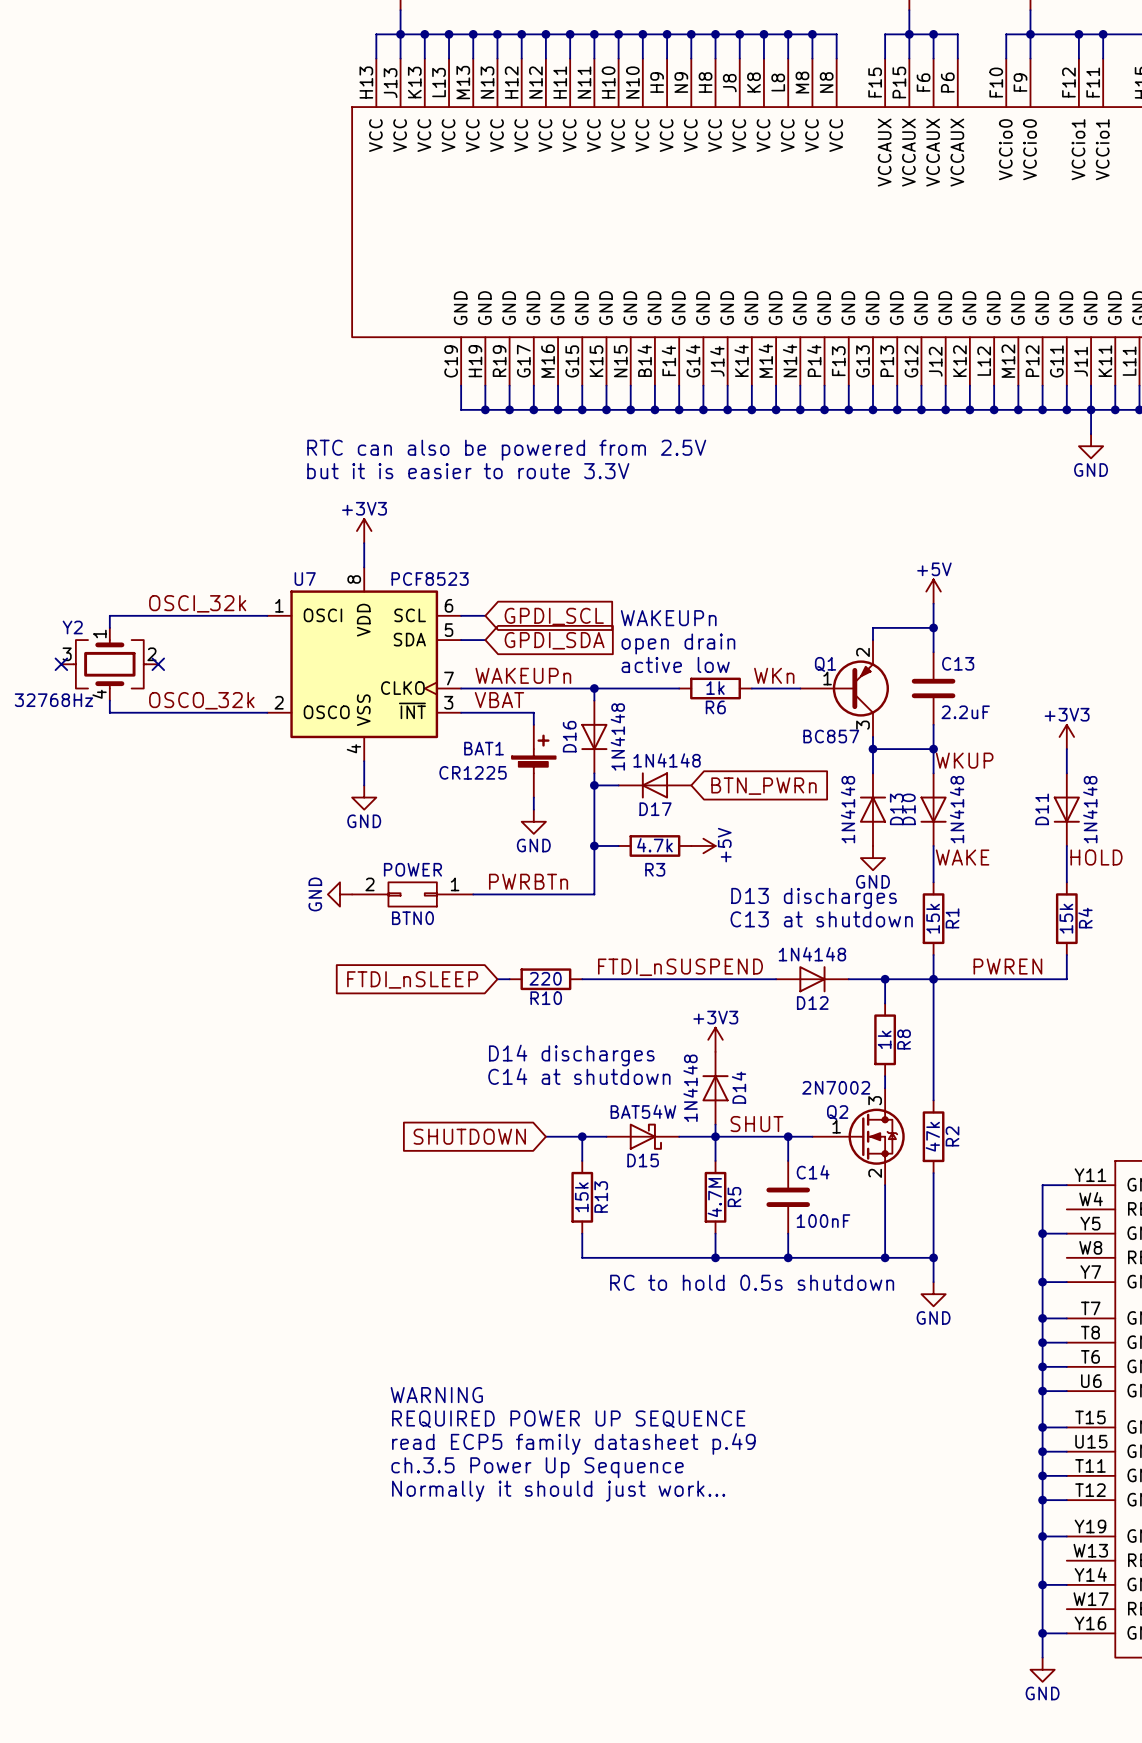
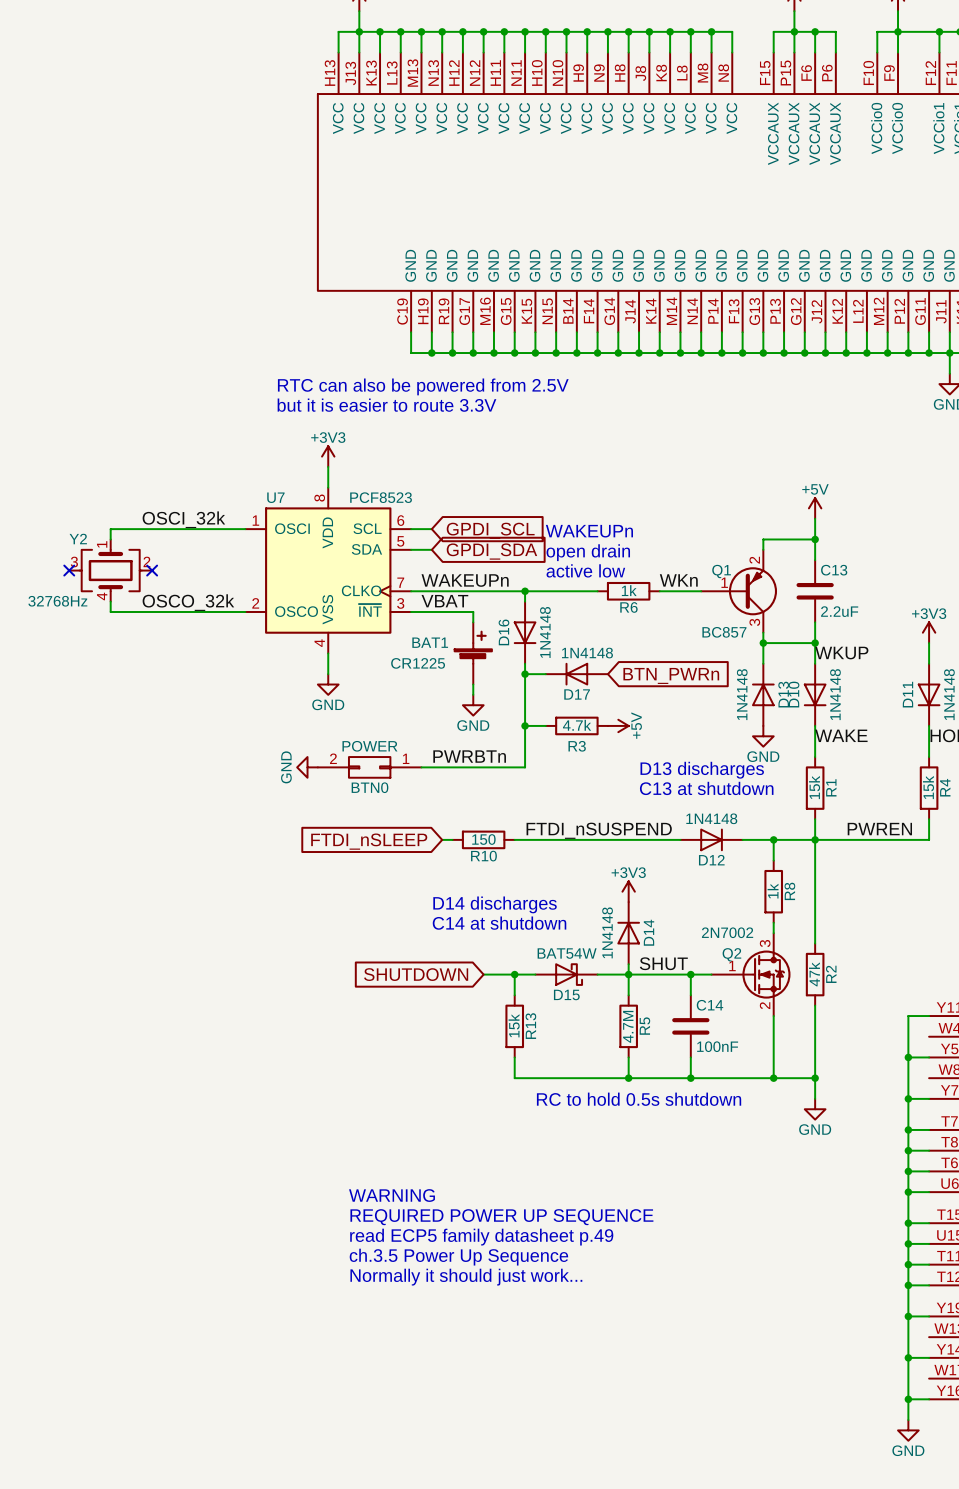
R10 value: 220 (545, 978) -> 150 (483, 839)

